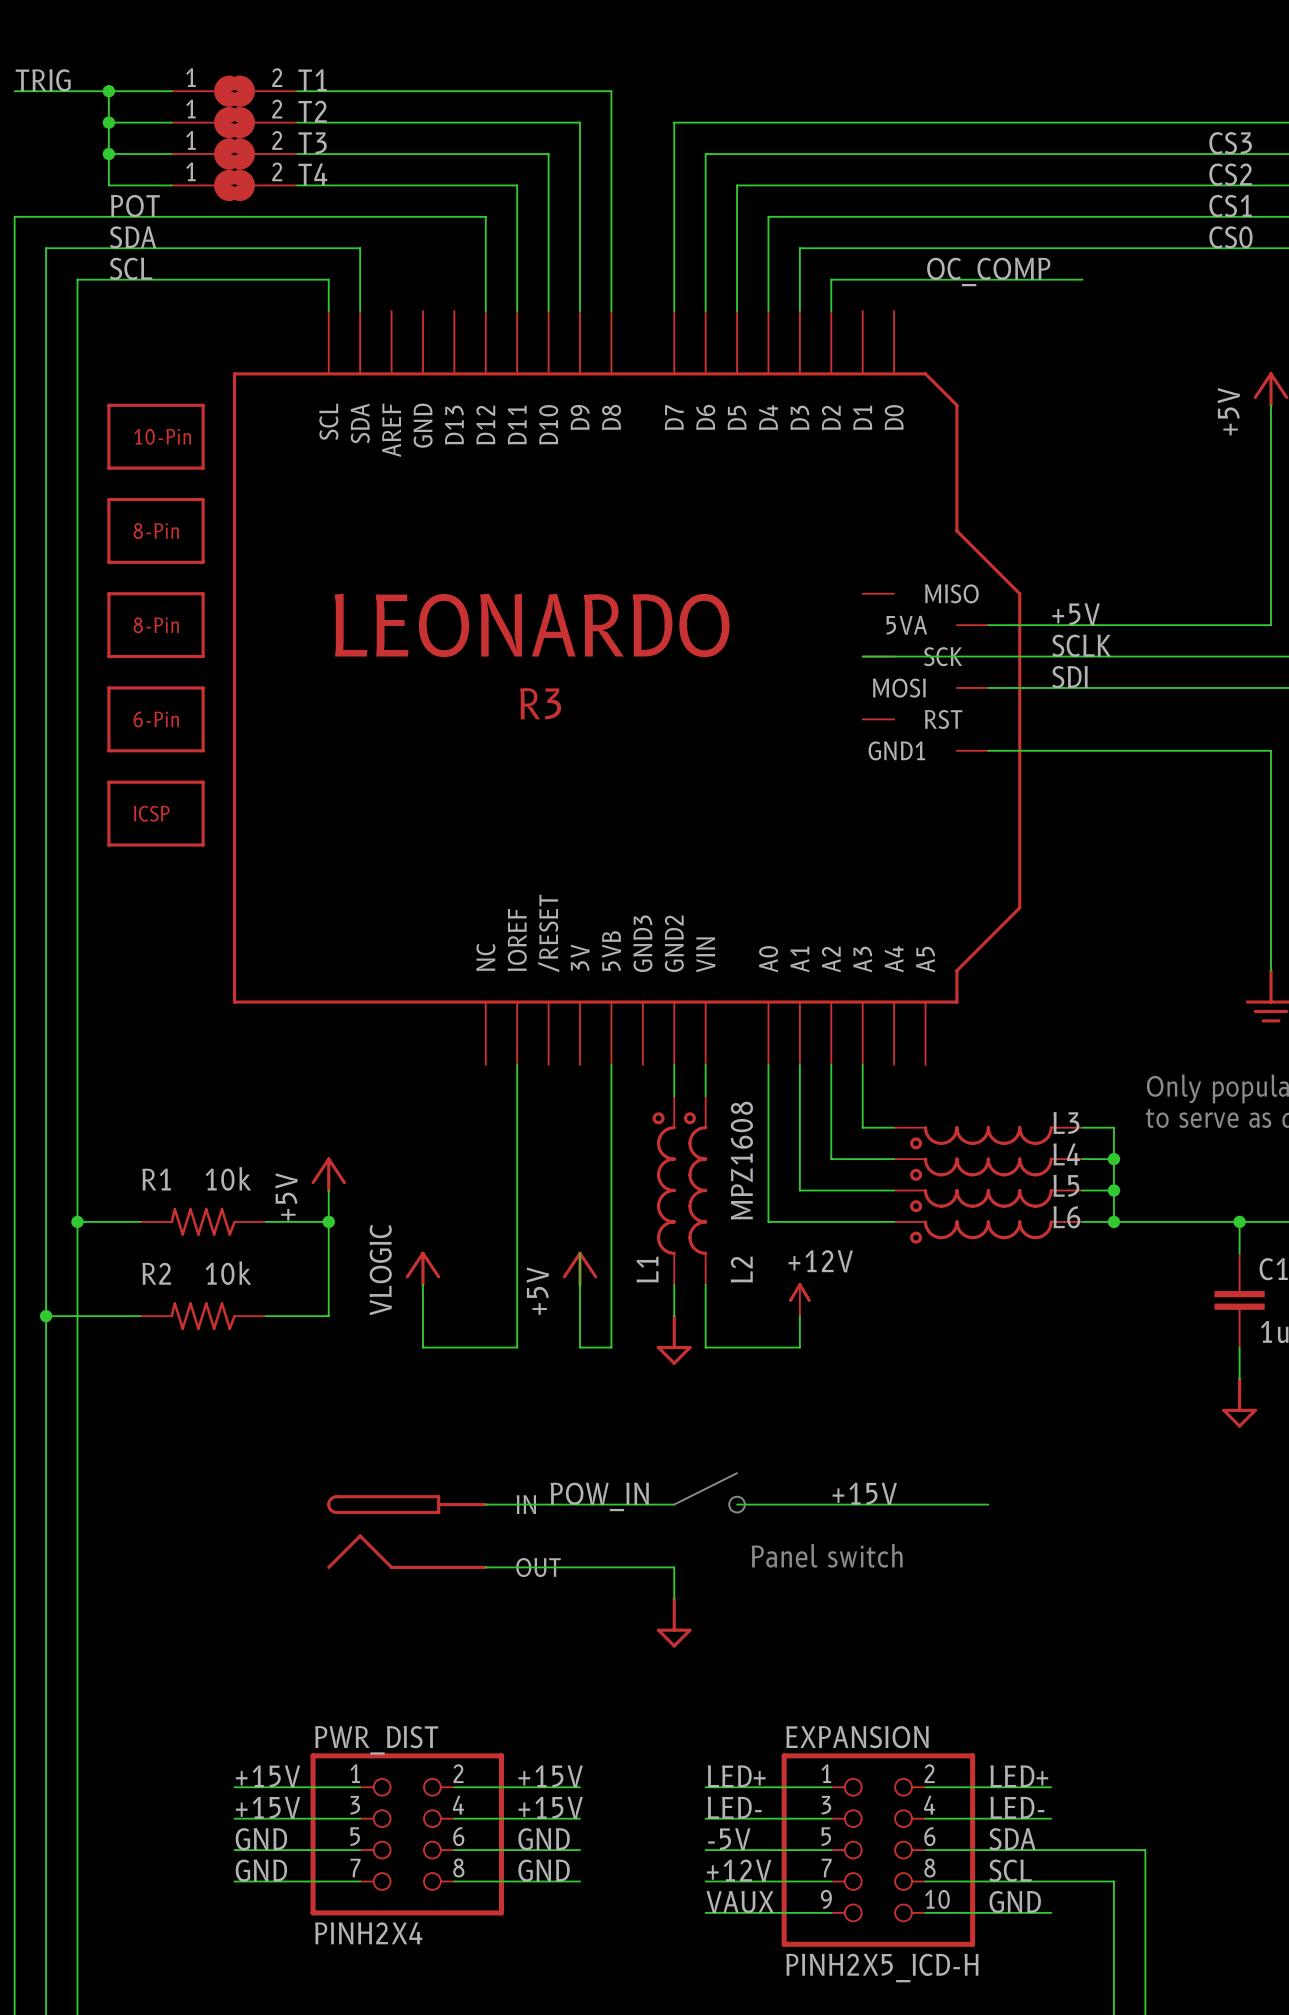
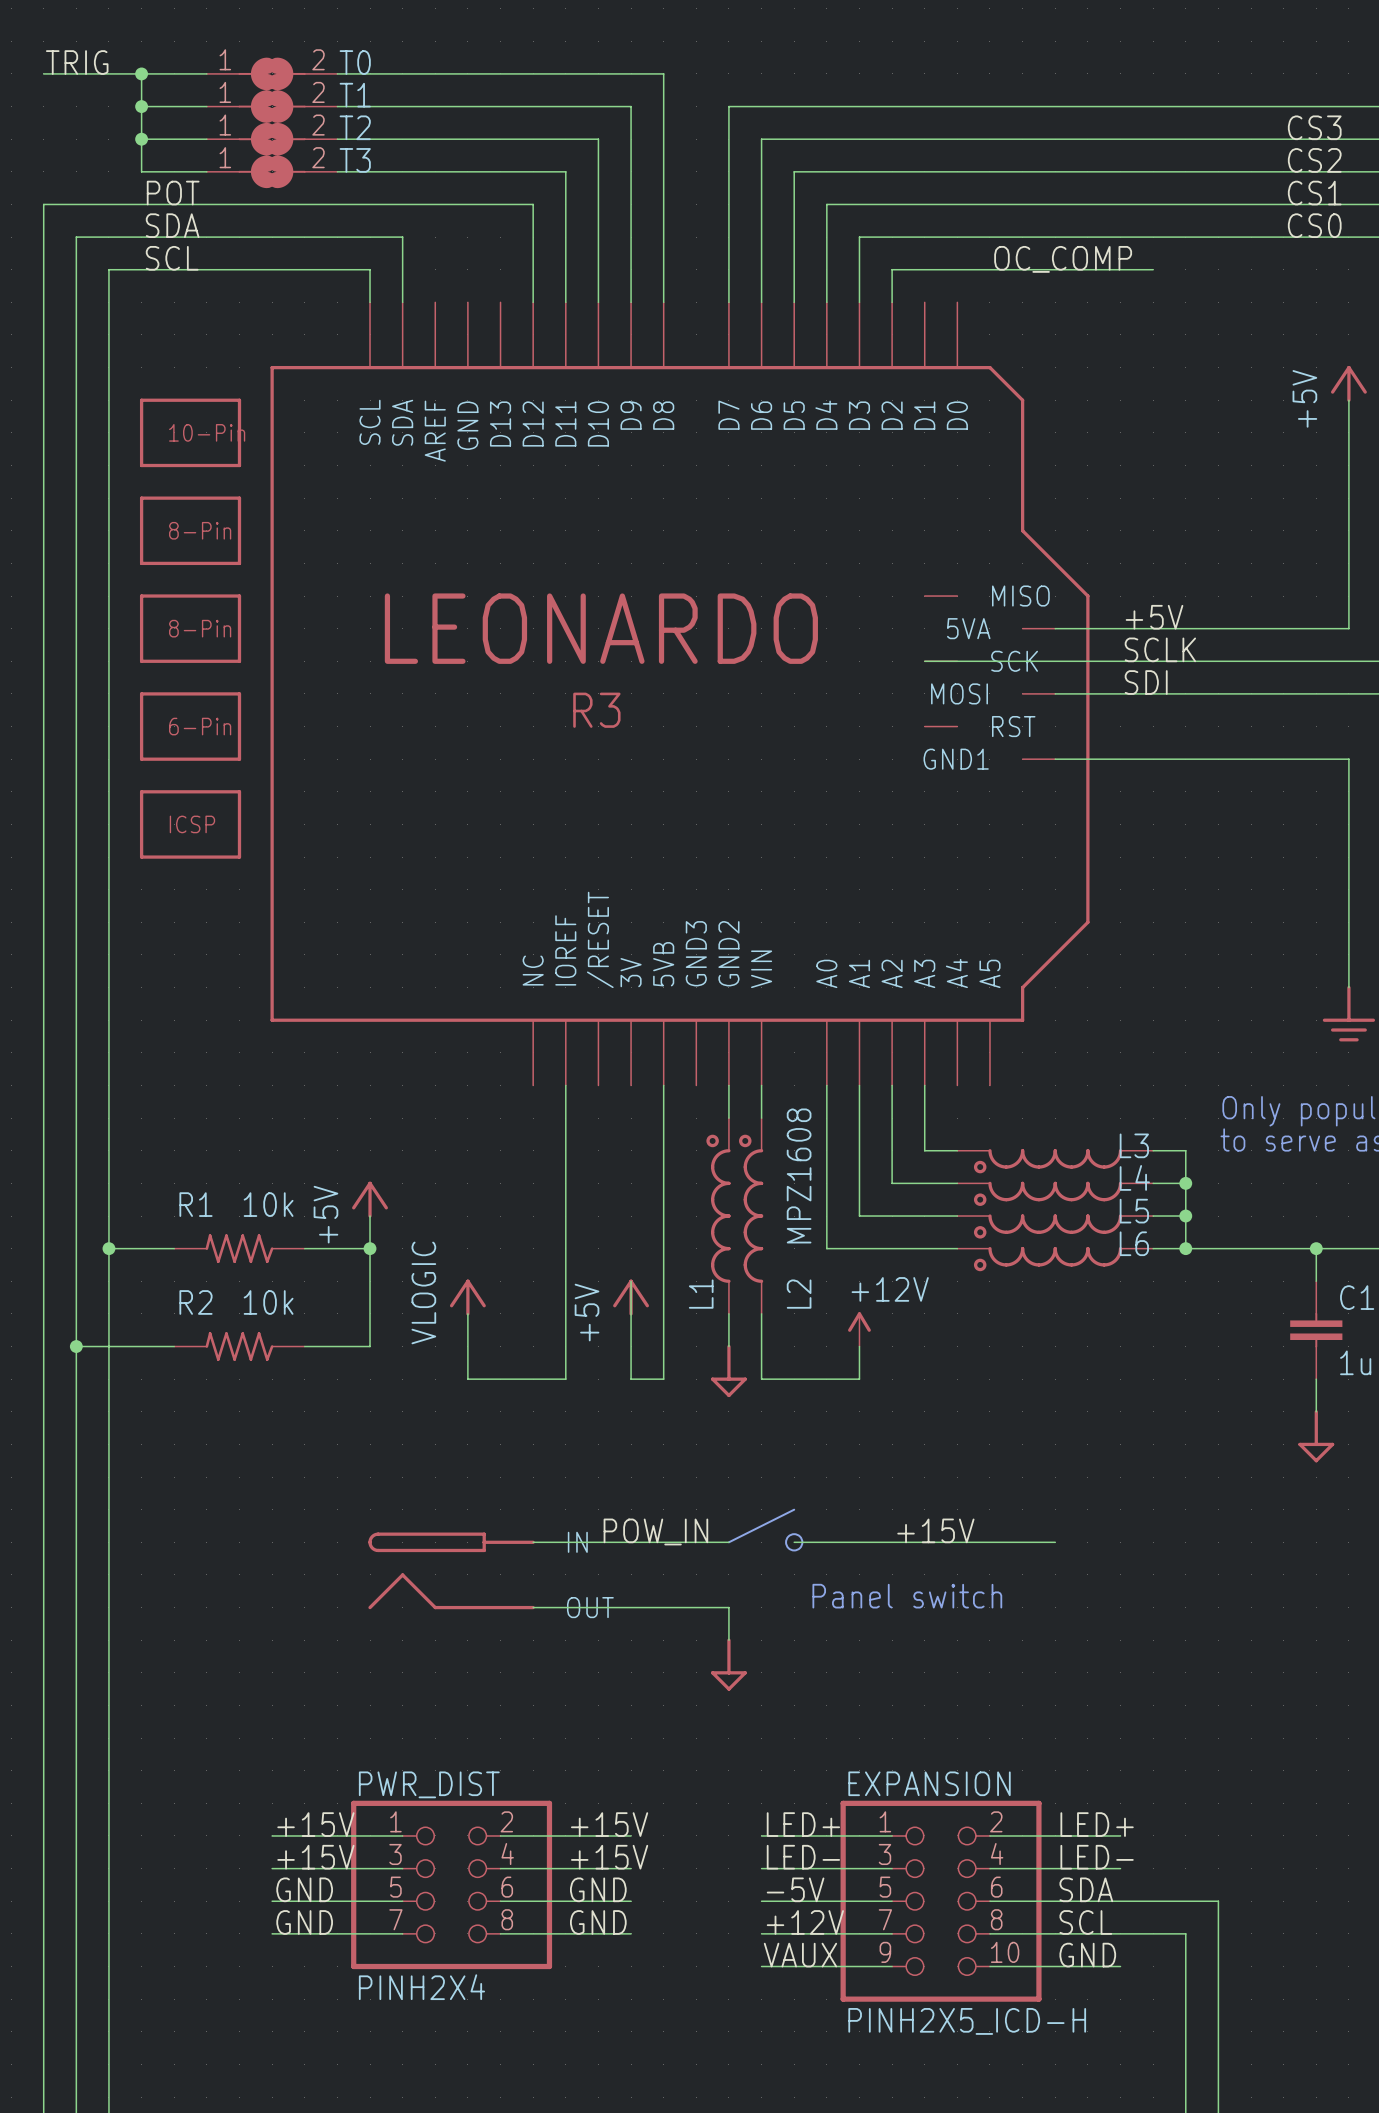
T1 name: T1 (312, 80) -> T0 (355, 62)
T2 name: T2 (312, 111) -> T1 (355, 95)
T3 name: T3 (312, 143) -> T2 (355, 127)
T4 name: T4 (312, 174) -> T3 (355, 160)

